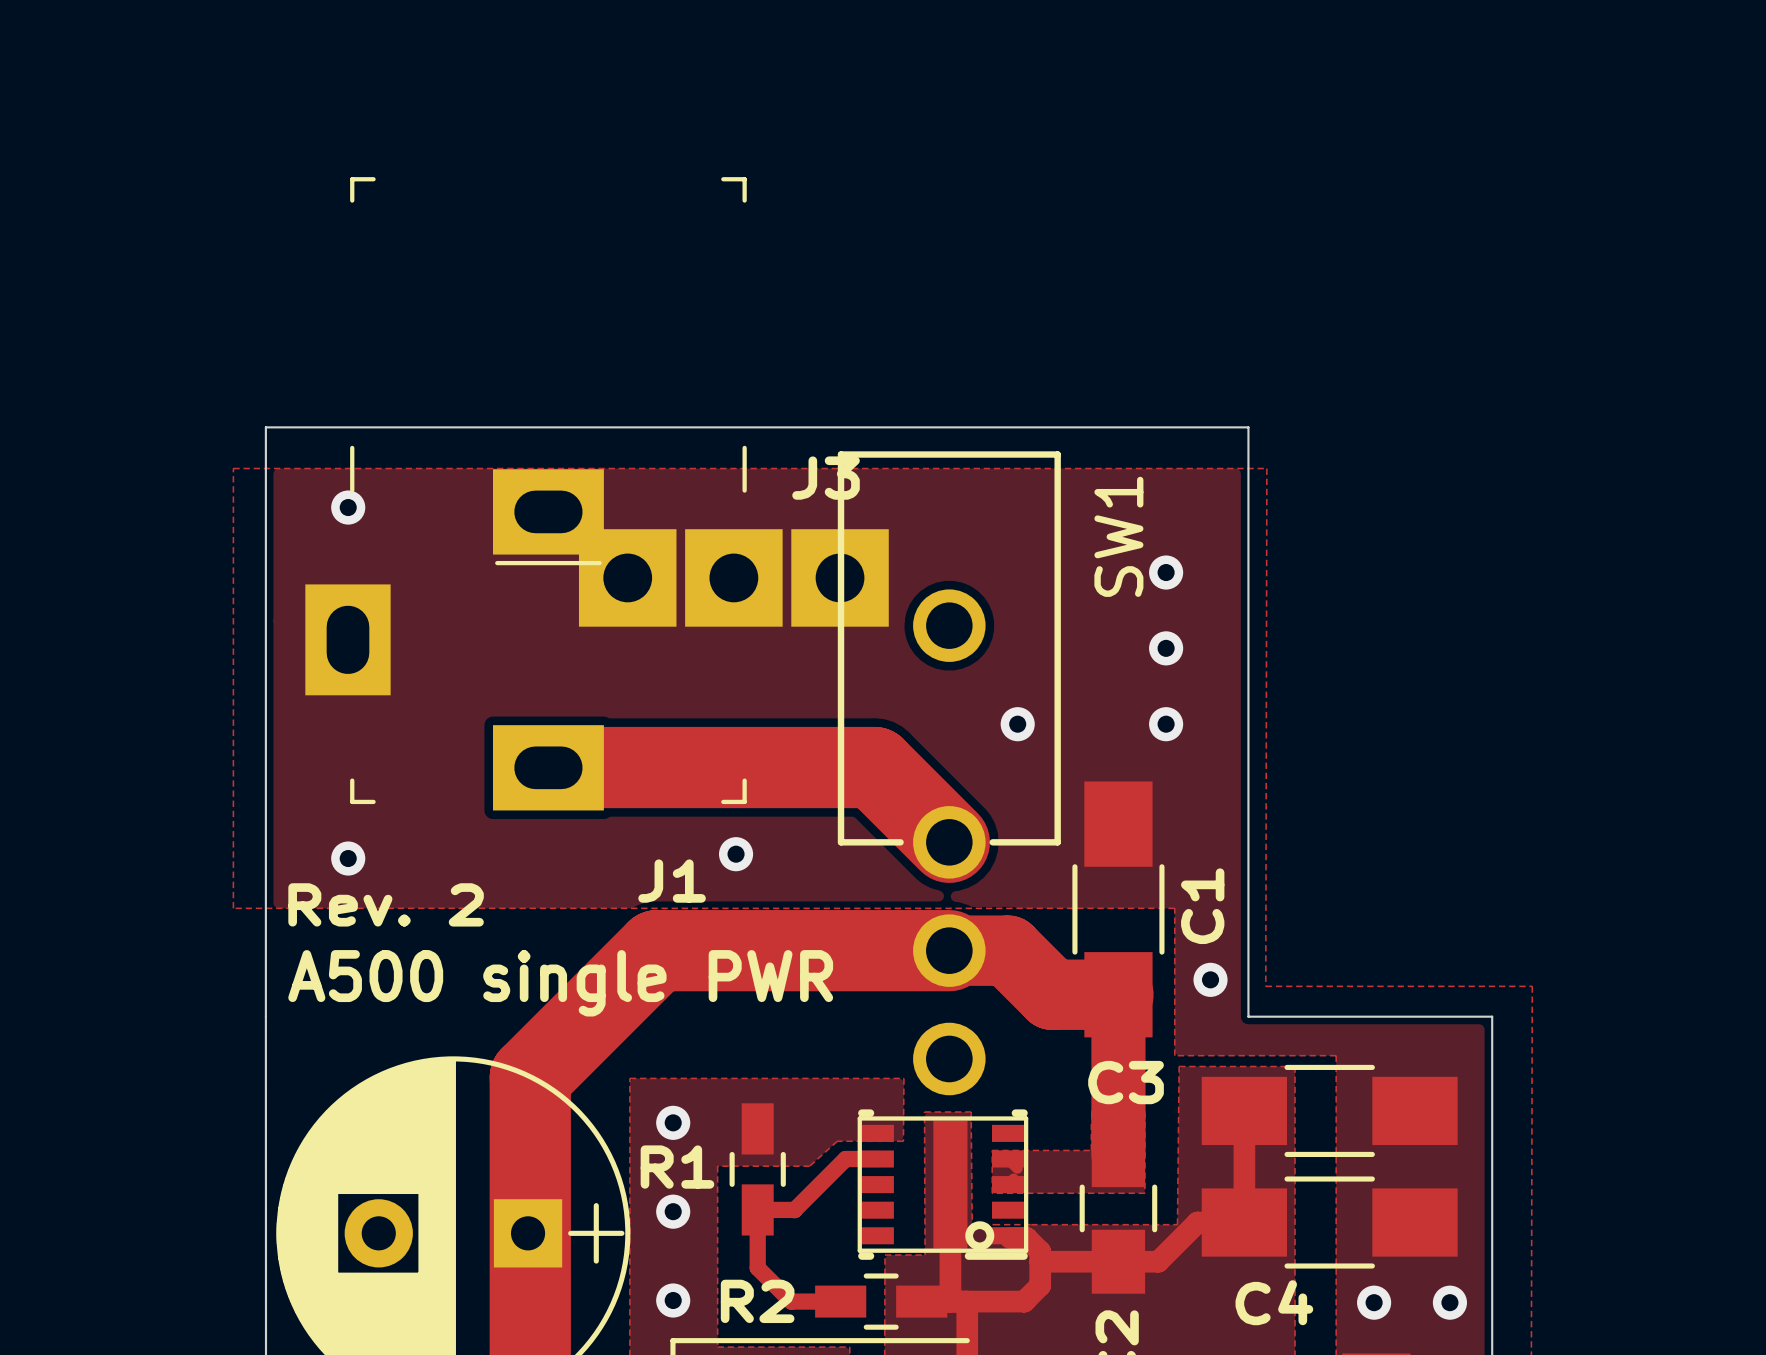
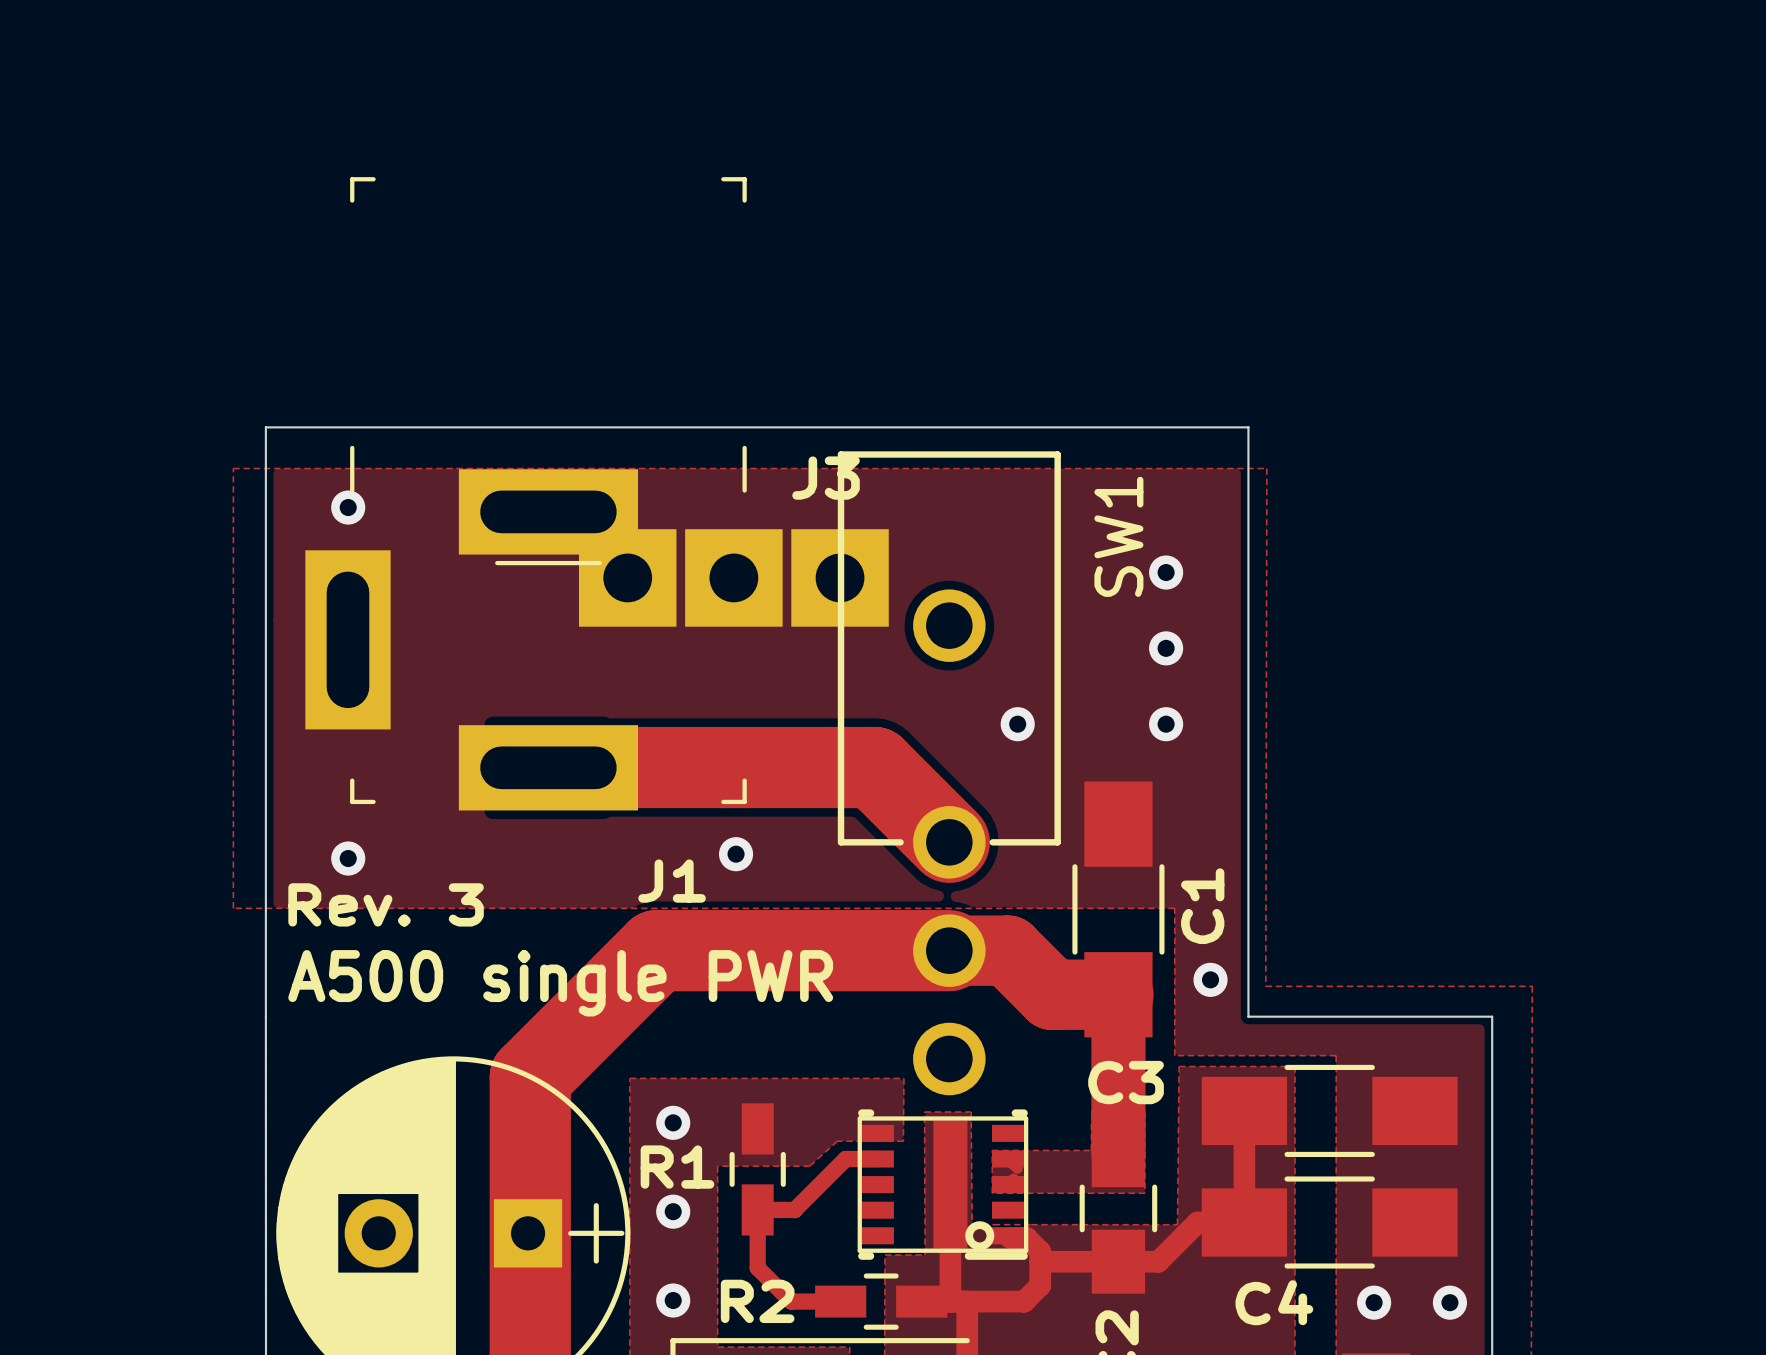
J1 footprint: [305, 177, 747, 811] -> [305, 177, 747, 811]
text: Rev. 2 (386, 904) -> Rev. 3 (386, 904)

